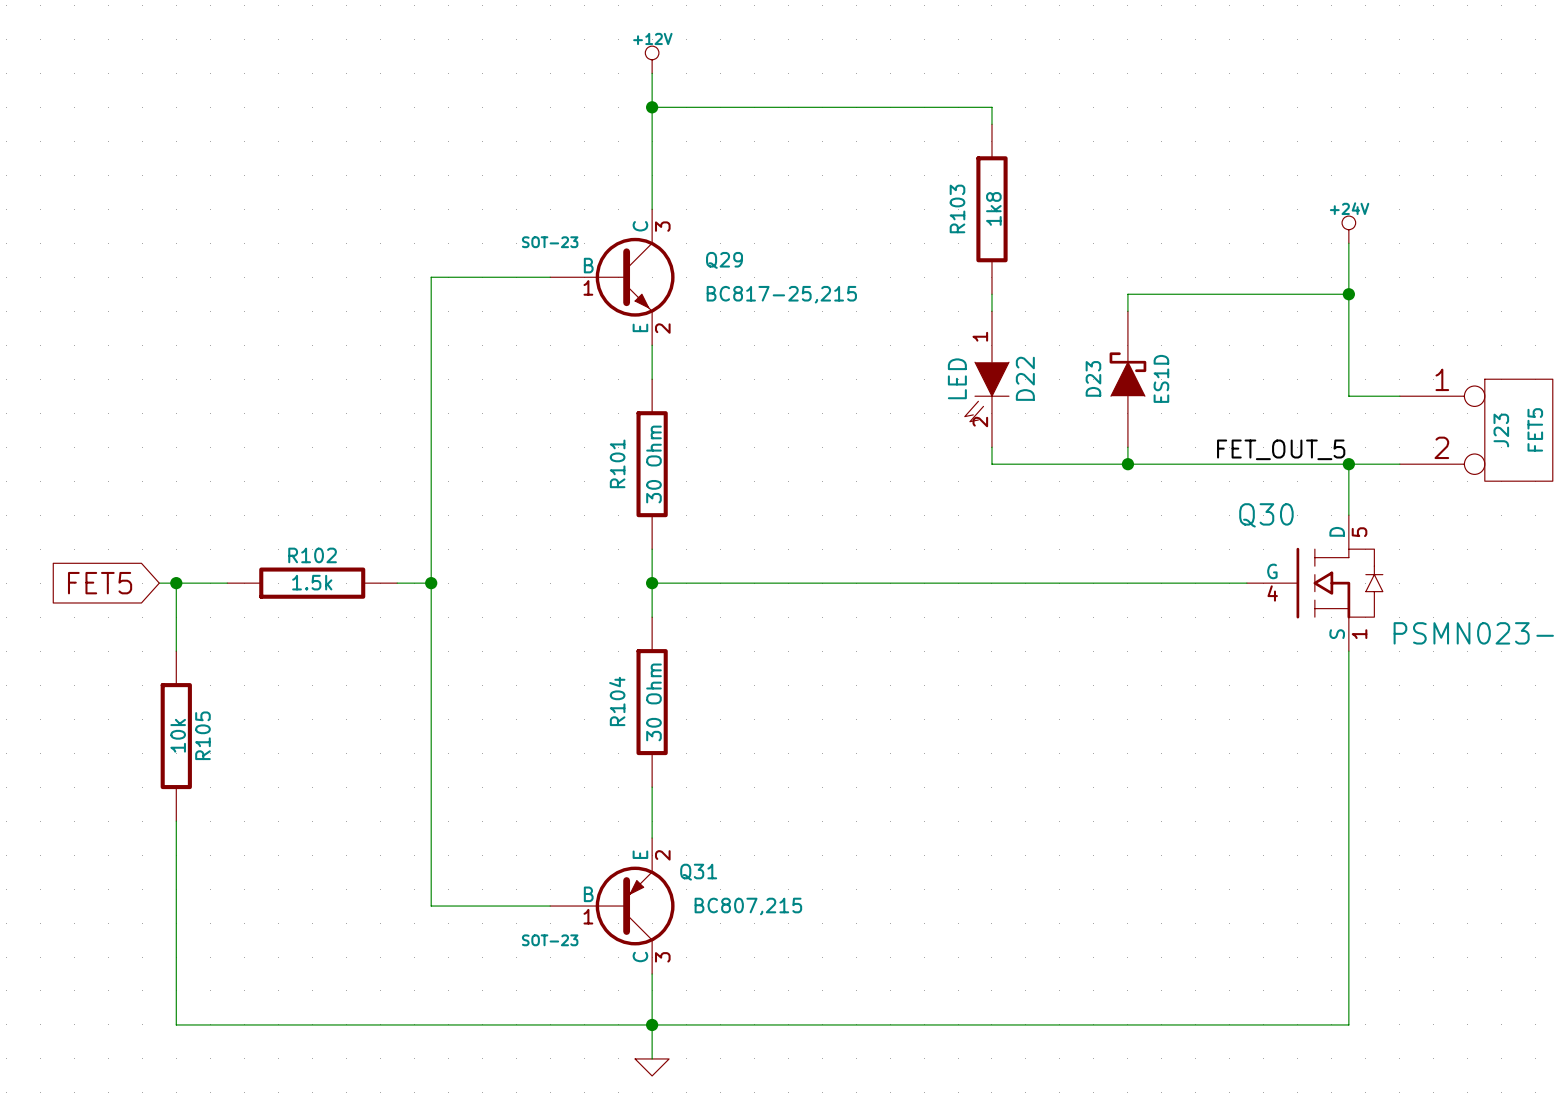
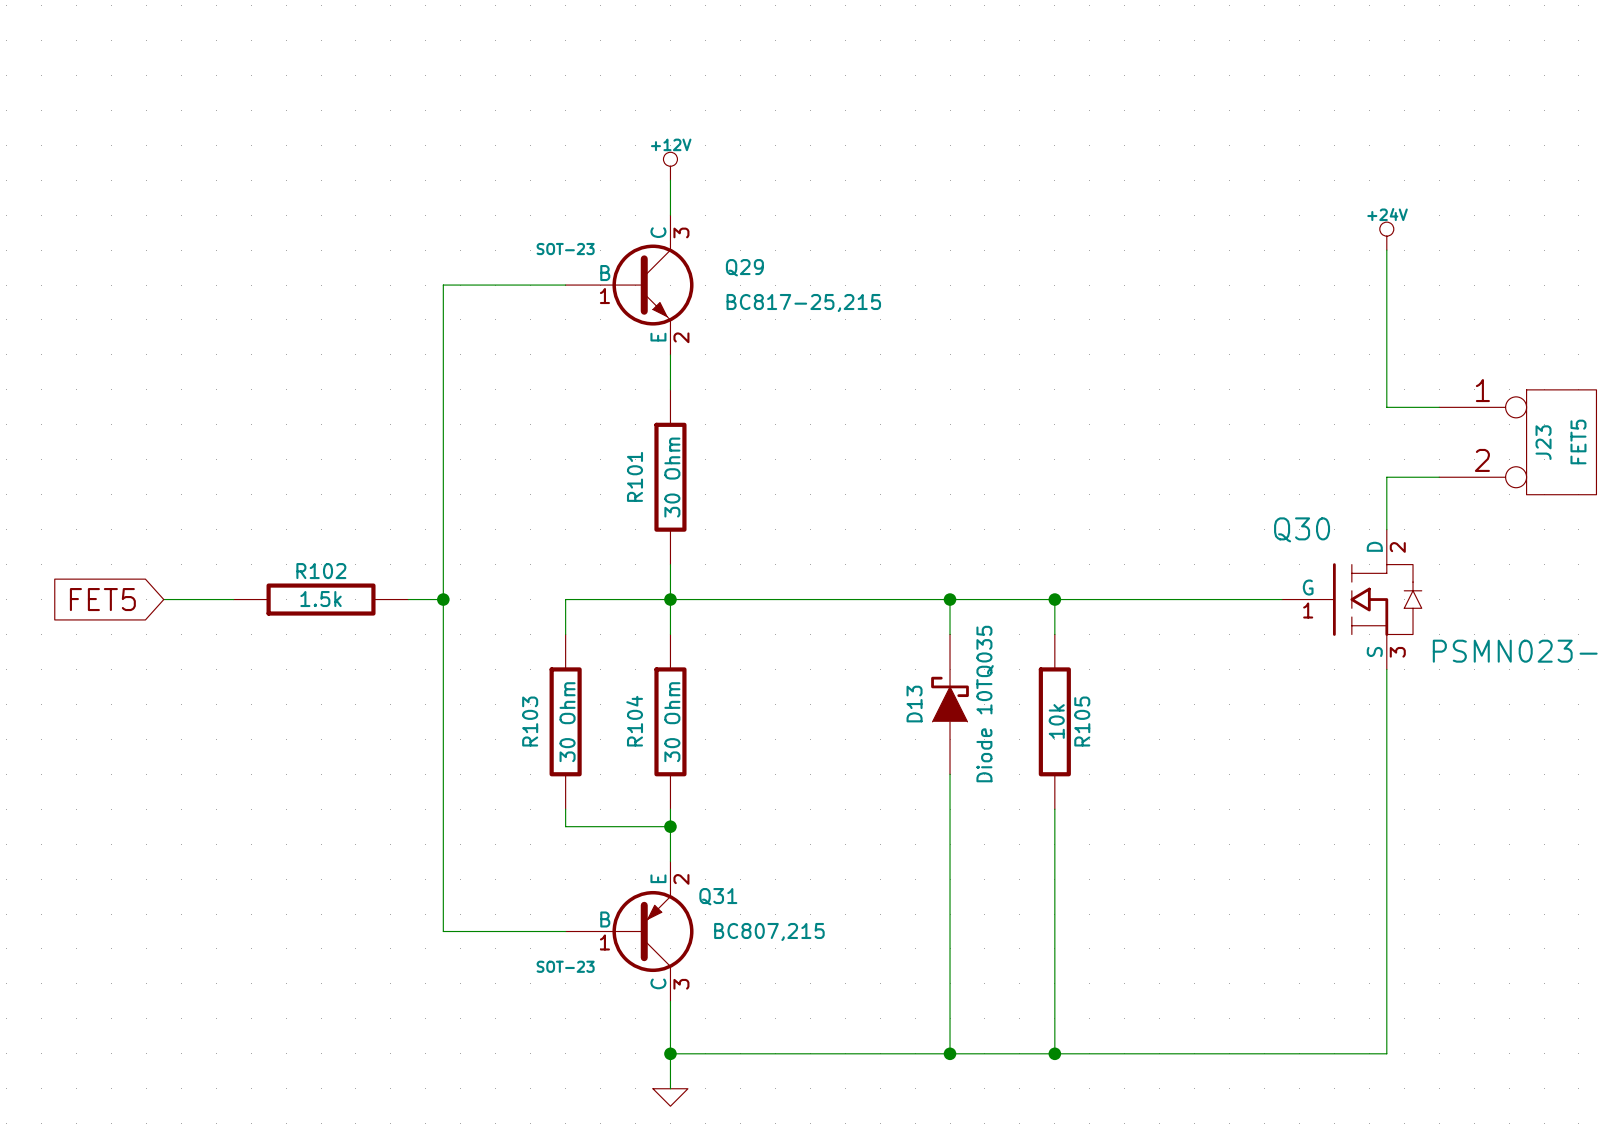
power symbol position: +12V (652, 59) -> +12V (670, 166)
wire: (652, 73) (652, 175) -> none
wire: (652, 107) (991, 107) (991, 124) -> none
junction: (652, 107) -> none
R103 value: 1k8 (993, 208) -> 30 Ohm (567, 722)
R103 position: (991, 209) -> (565, 721)
wire: (991, 294) (991, 311) -> none
wire: (1348, 294) (1127, 294) (1127, 311) -> none
junction: (1348, 294) -> none
D22: LED (986, 379) -> none
D23: ES1D (1127, 379) -> none
wire: (991, 447) (991, 464) (1348, 464) -> none
wire: (1127, 447) (1127, 464) -> none
label: FET_OUT_5 (1281, 449) -> none
junction: (1127, 464) -> none
junction: (1348, 464) -> none
Q30 pin number: 5 (1359, 532) -> 2 (1397, 547)
wire: (176, 583) (176, 651) -> none
junction: (176, 583) -> none
wire: none -> (670, 599) (565, 599) (565, 634)
wire: none -> (950, 599) (950, 634)
junction: none -> (950, 599)
wire: none -> (1054, 599) (1054, 634)
junction: none -> (1054, 599)
Q30 pin number: 4 (1272, 593) -> 1 (1308, 610)
Q30 pin number: 1 (1359, 634) -> 3 (1397, 652)
D13: none -> Diode 10TQ035 (950, 704)
R105 position: (176, 736) -> (1054, 721)
wire: none -> (950, 774) (950, 1053)
wire: none -> (565, 809) (565, 826) (670, 826)
wire: none -> (1054, 809) (1054, 1053)
junction: none -> (670, 826)
wire: (176, 821) (176, 1024) (652, 1024) -> none
junction: none -> (950, 1053)
junction: none -> (1054, 1053)

